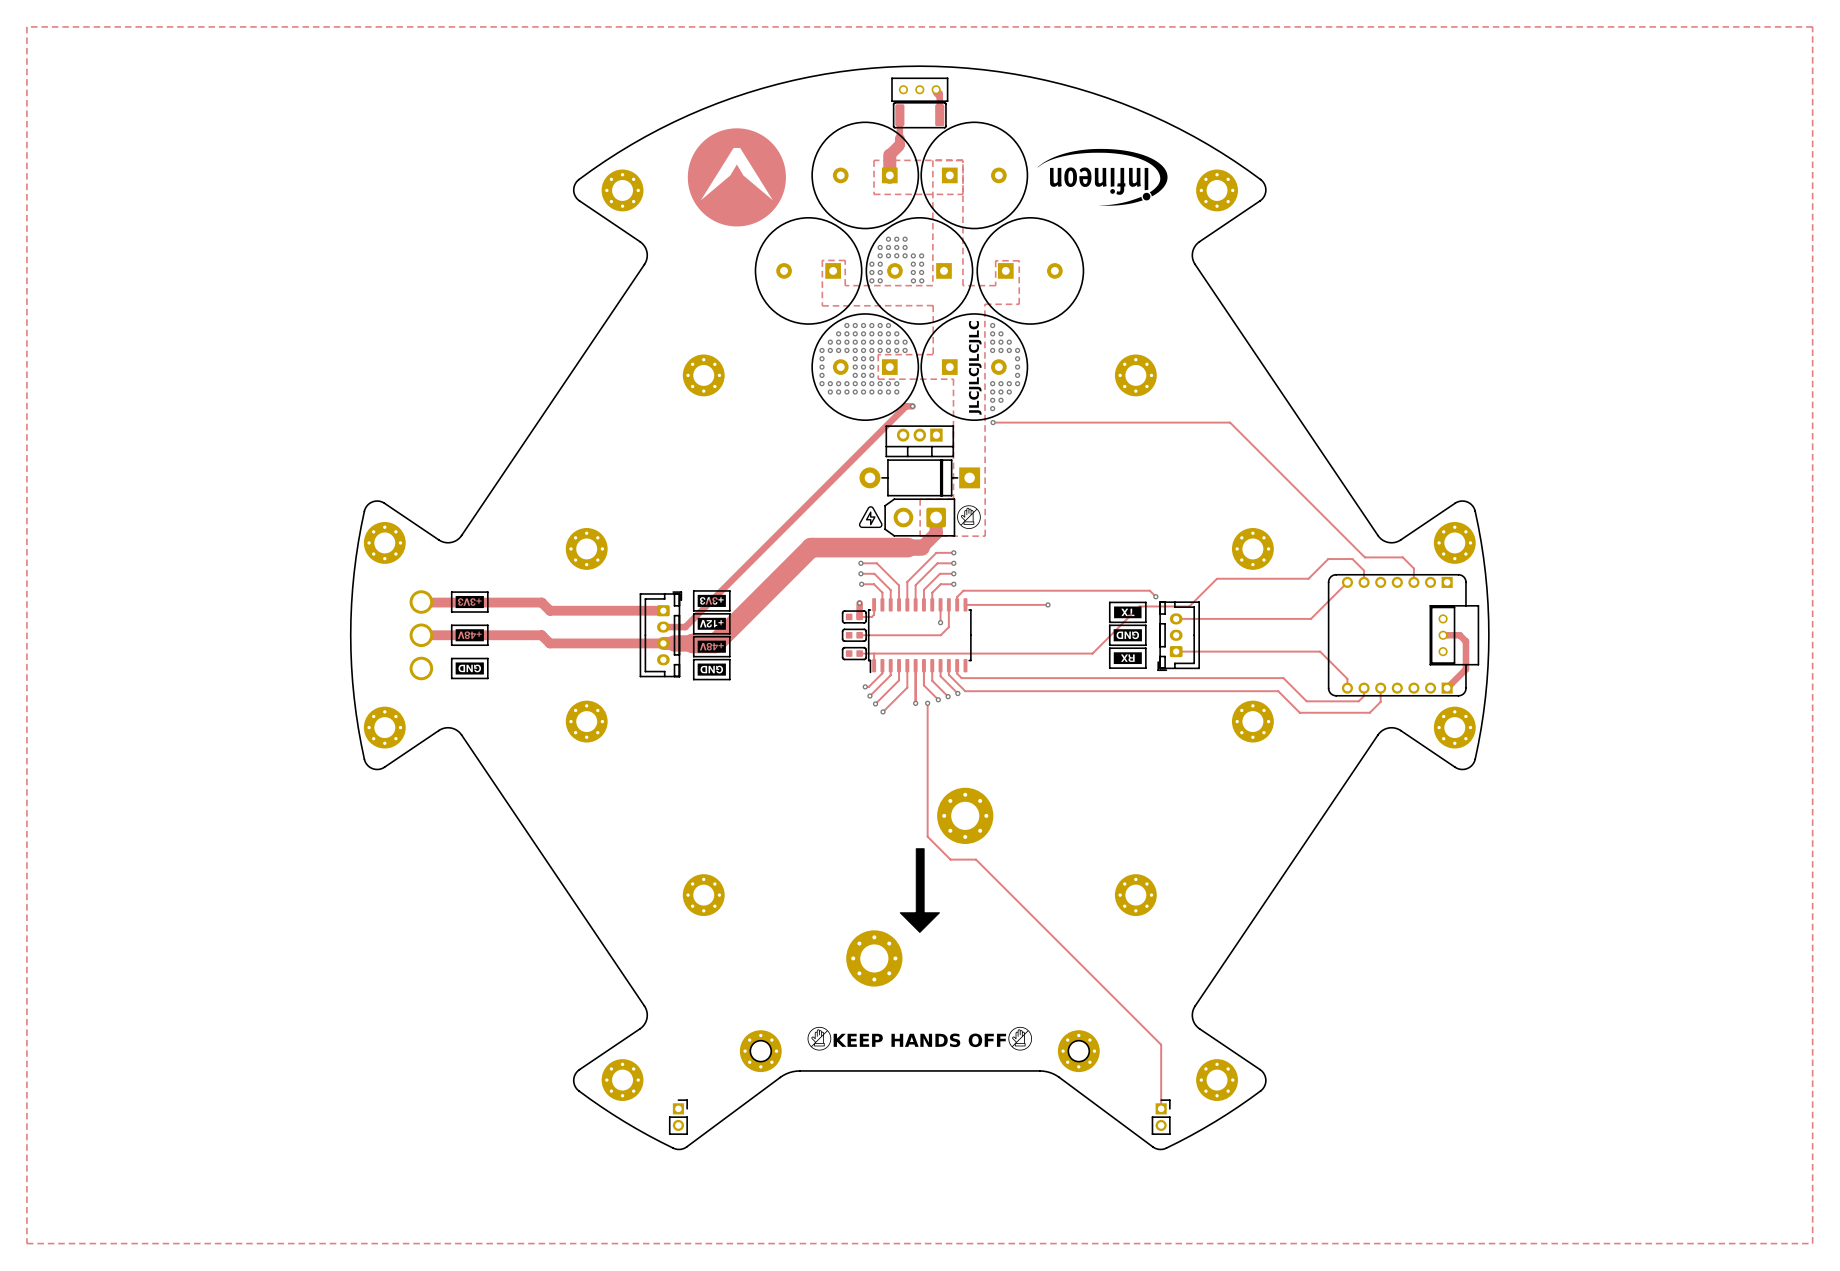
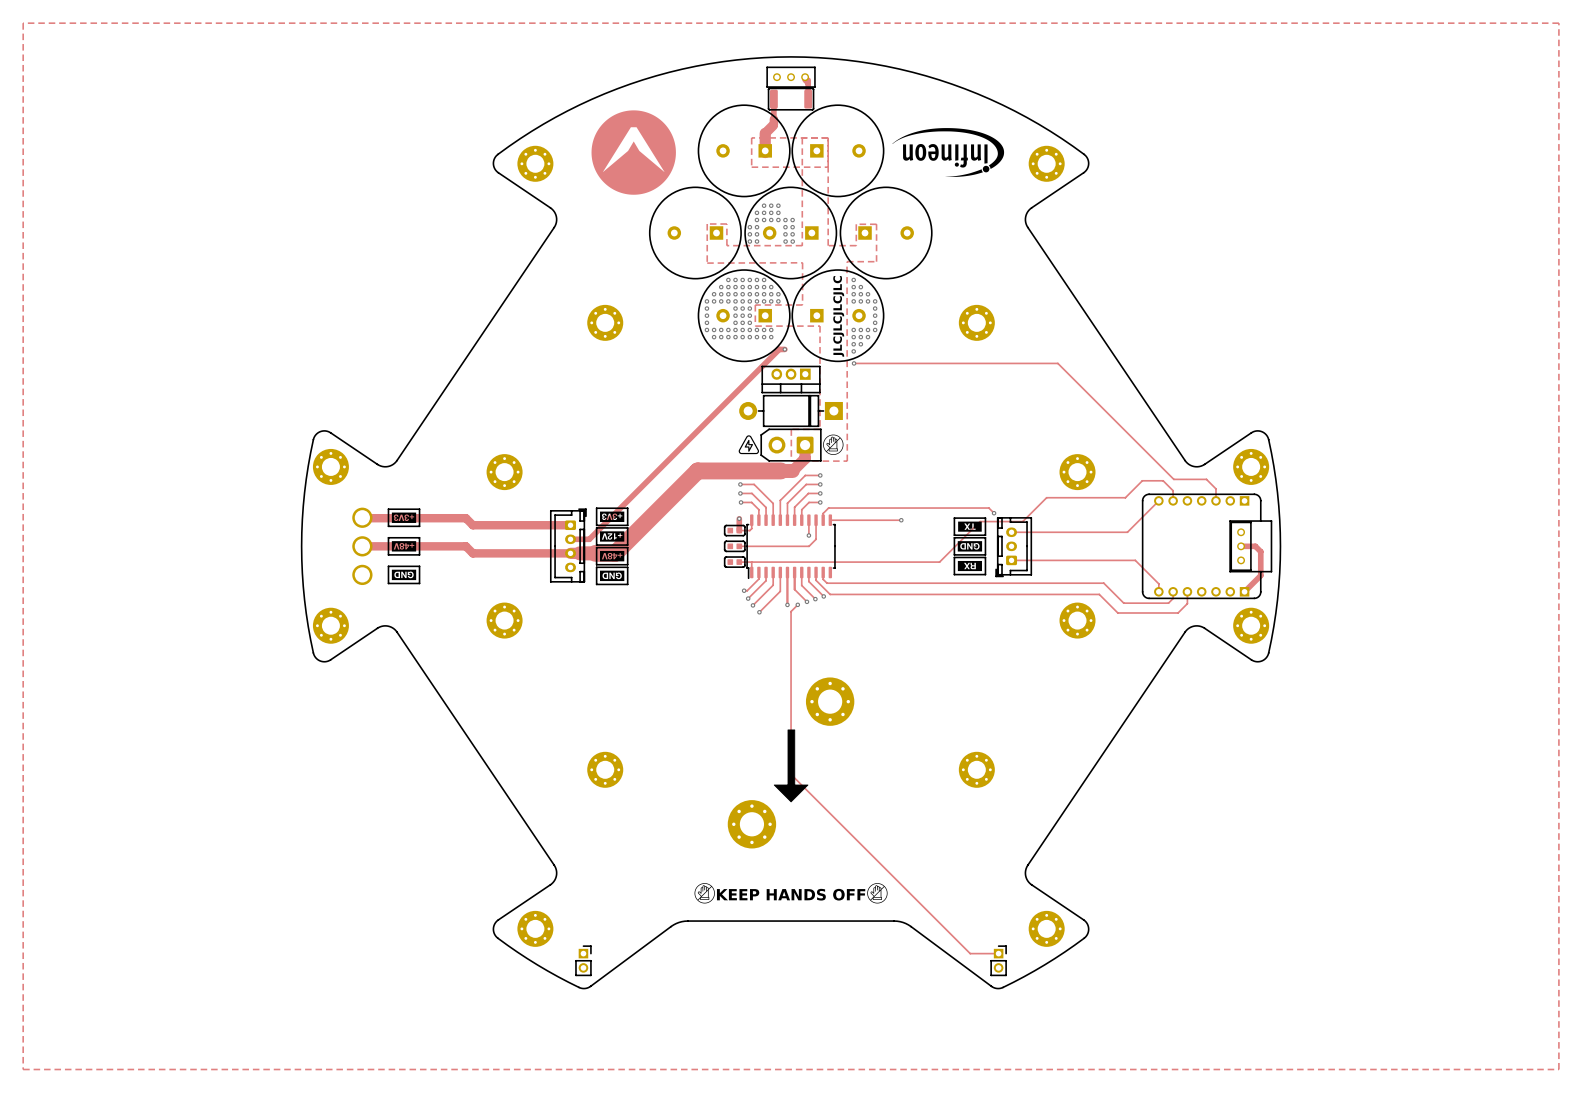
track: (927, 703) (927, 836) (950, 859) (976, 859) (1161, 1044) (1161, 1108) -> (797, 604) (791, 611) (791, 774) (970, 953) (998, 953)
round board edge: [749, 1040, 772, 1063] -> none
round board edge: [1067, 1040, 1090, 1063] -> none
part: (760, 1051) -> none
part: (1078, 1051) -> none

